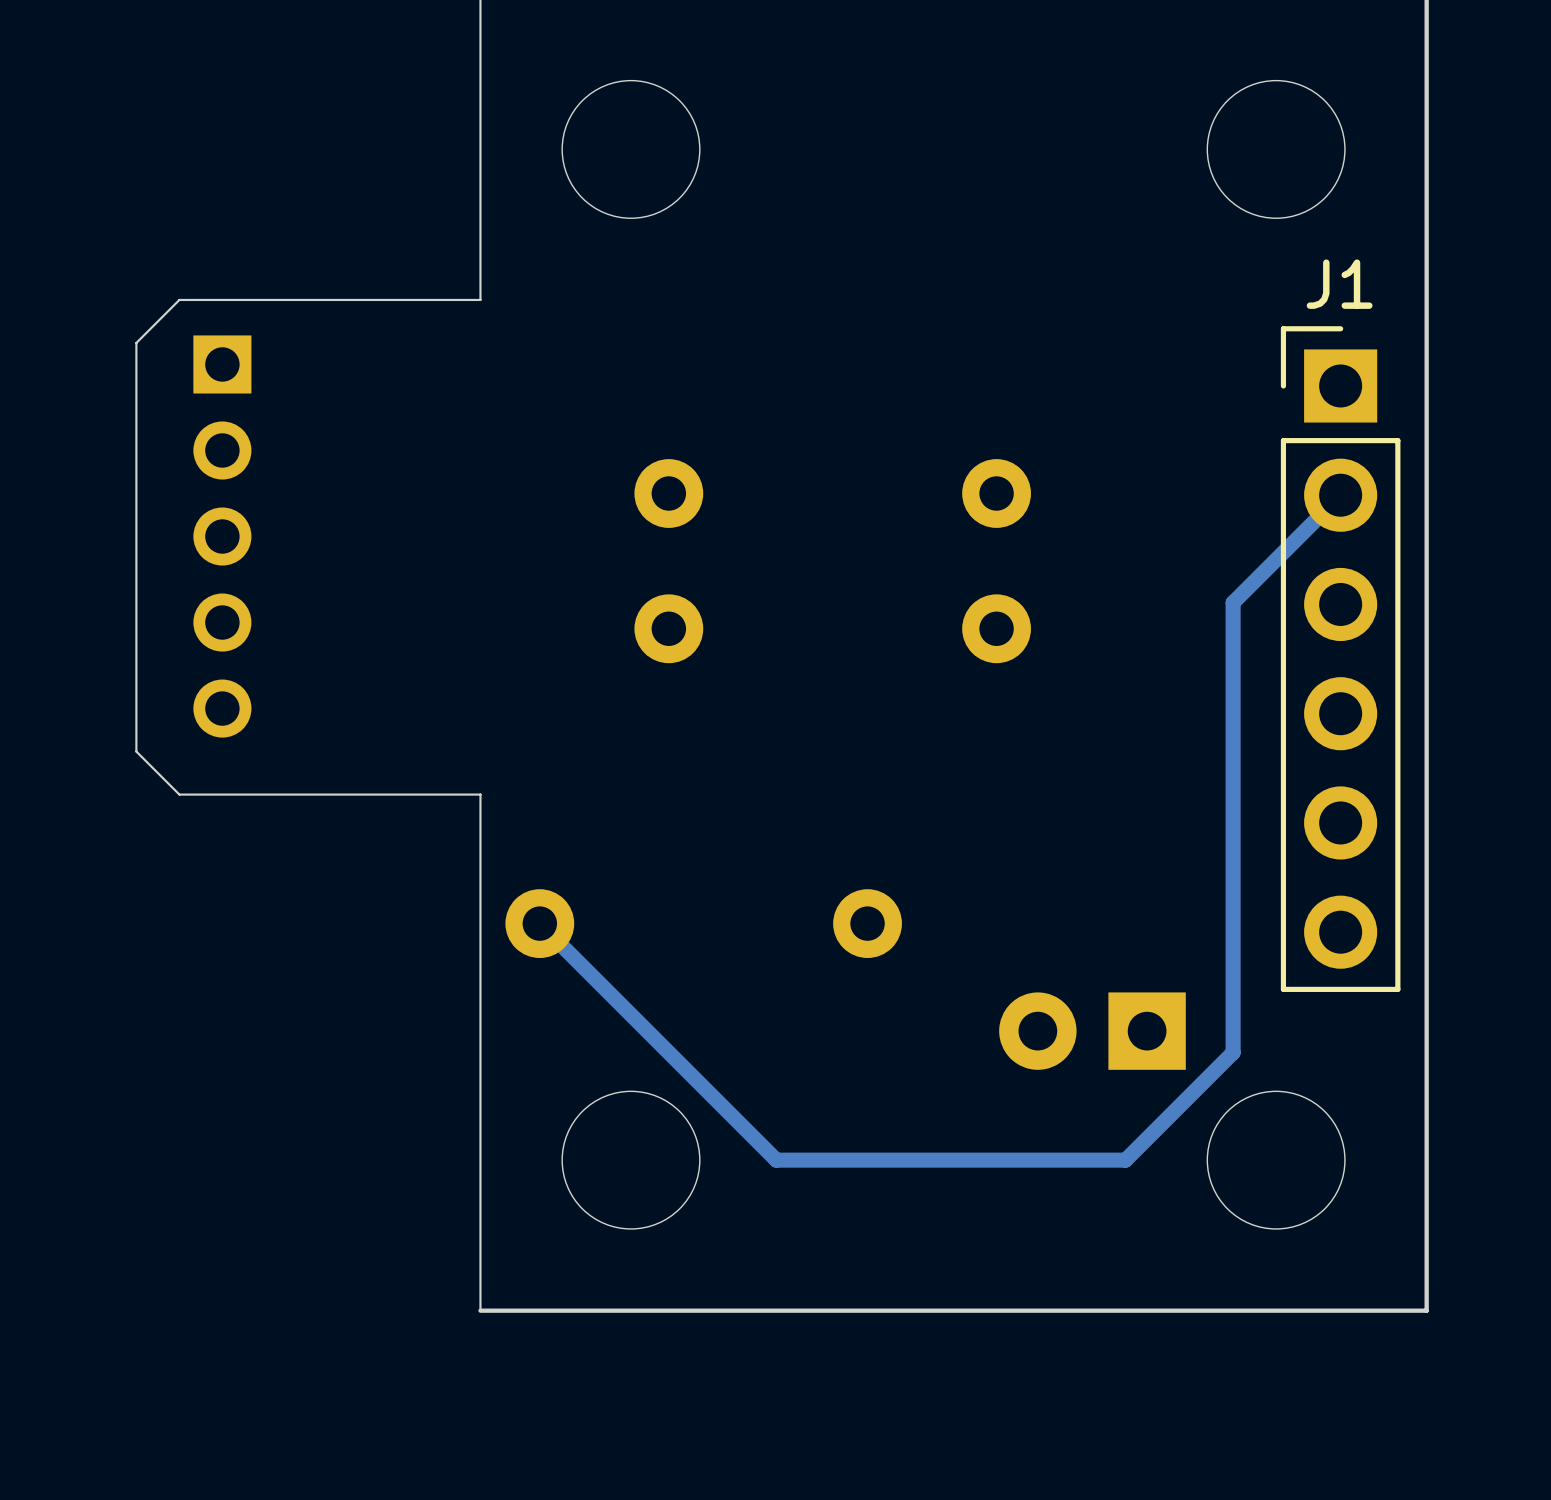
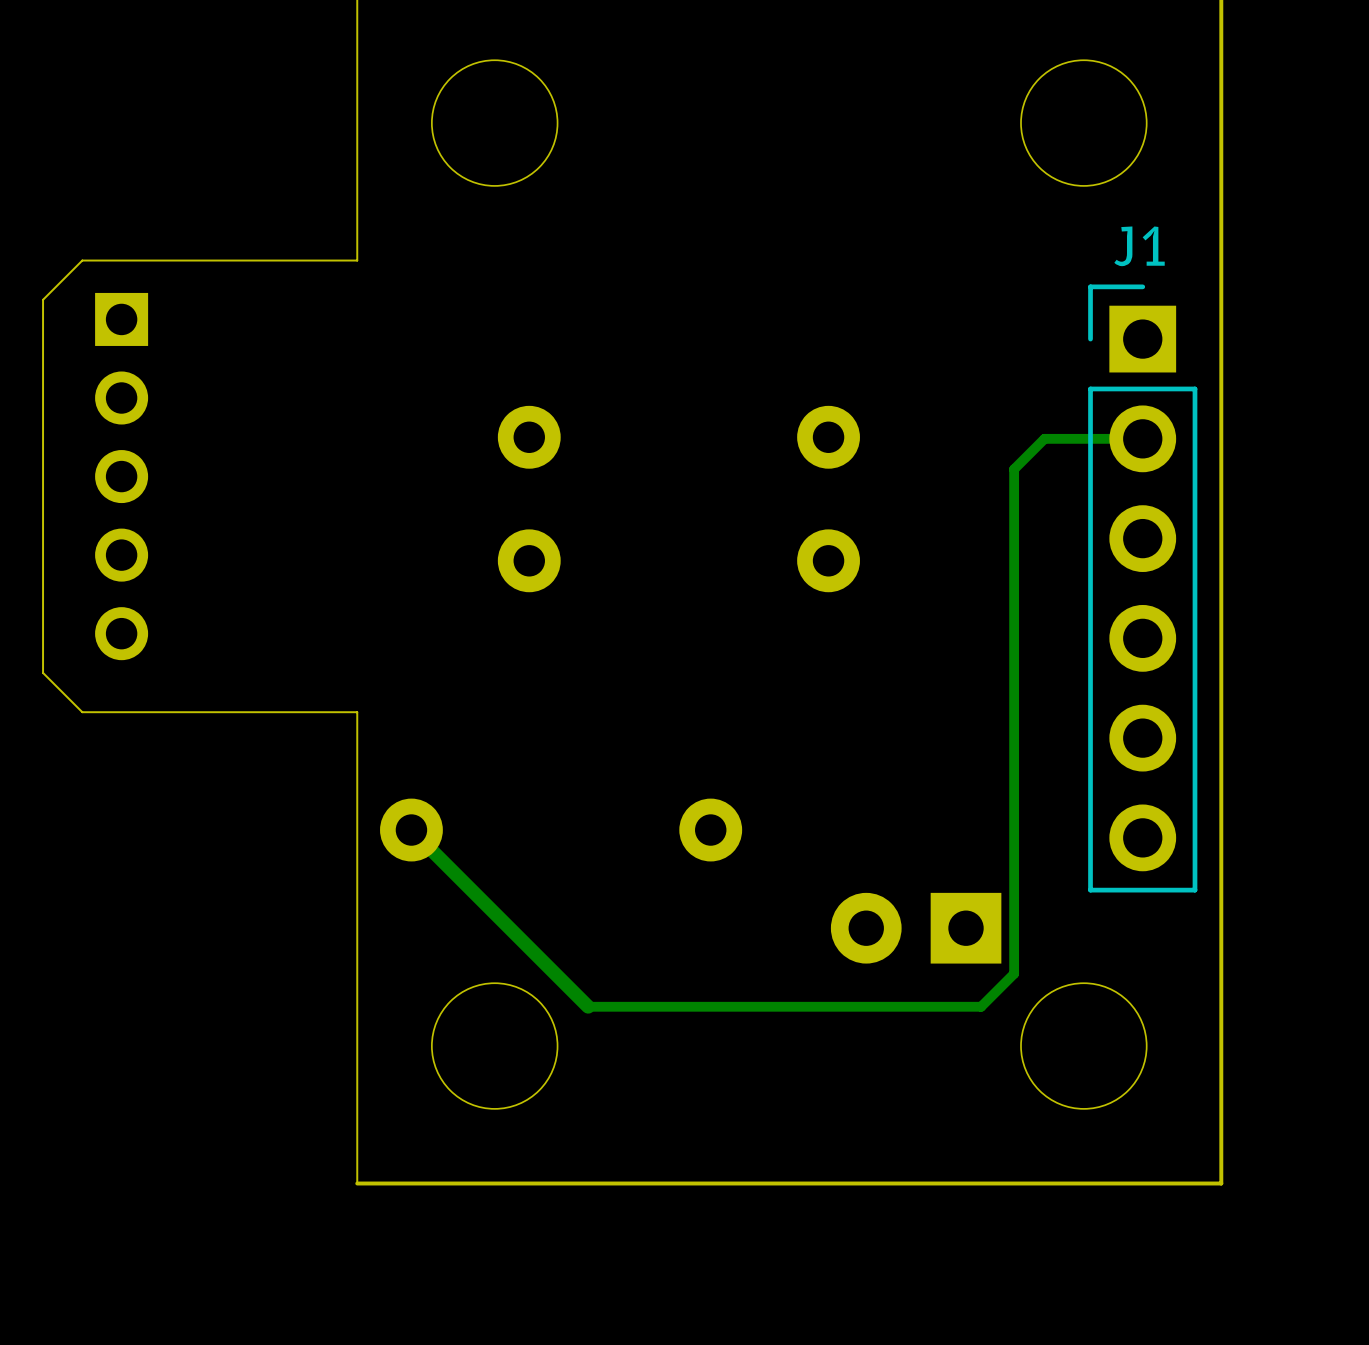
track: (1340, 495) (1233, 602) (1233, 1052) (1125, 1160) (776, 1160) (733, 1117) -> (1142, 438) (1044, 438) (1014, 469) (1014, 973) (981, 1006) (588, 1006)

